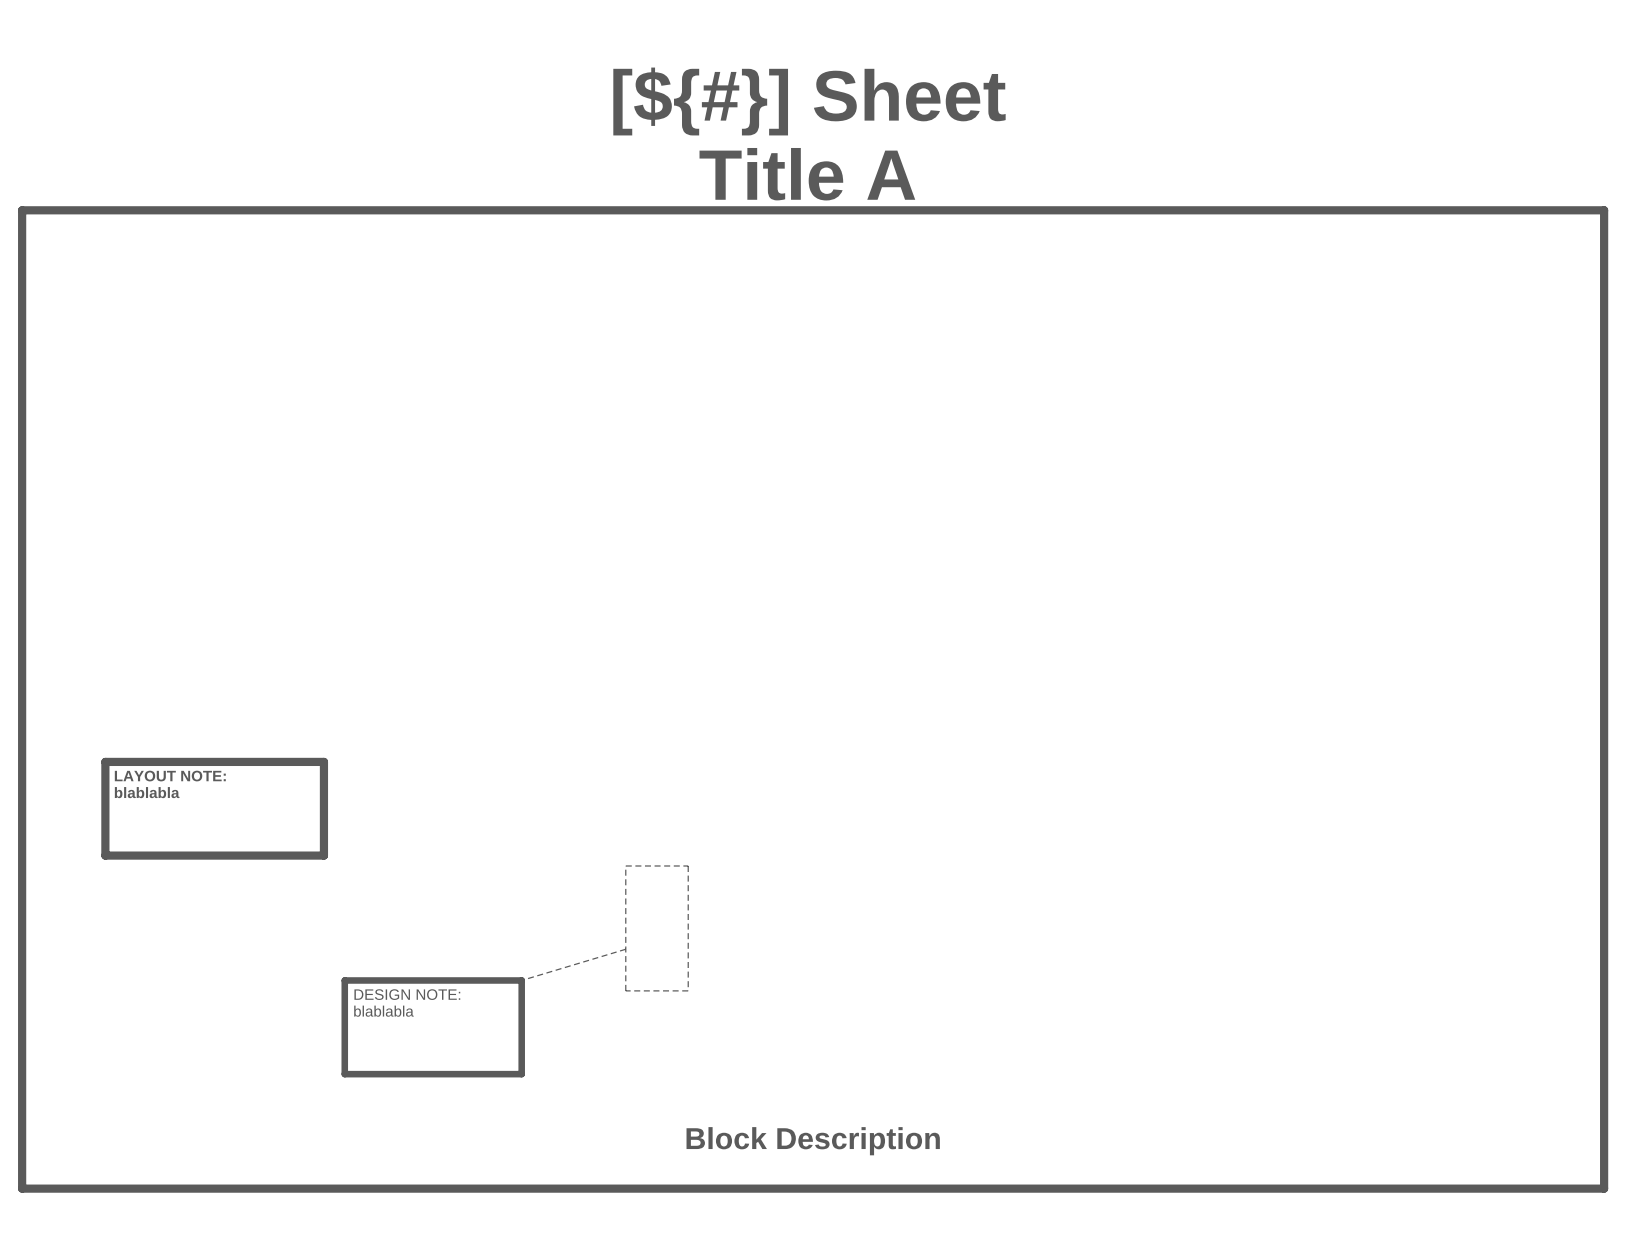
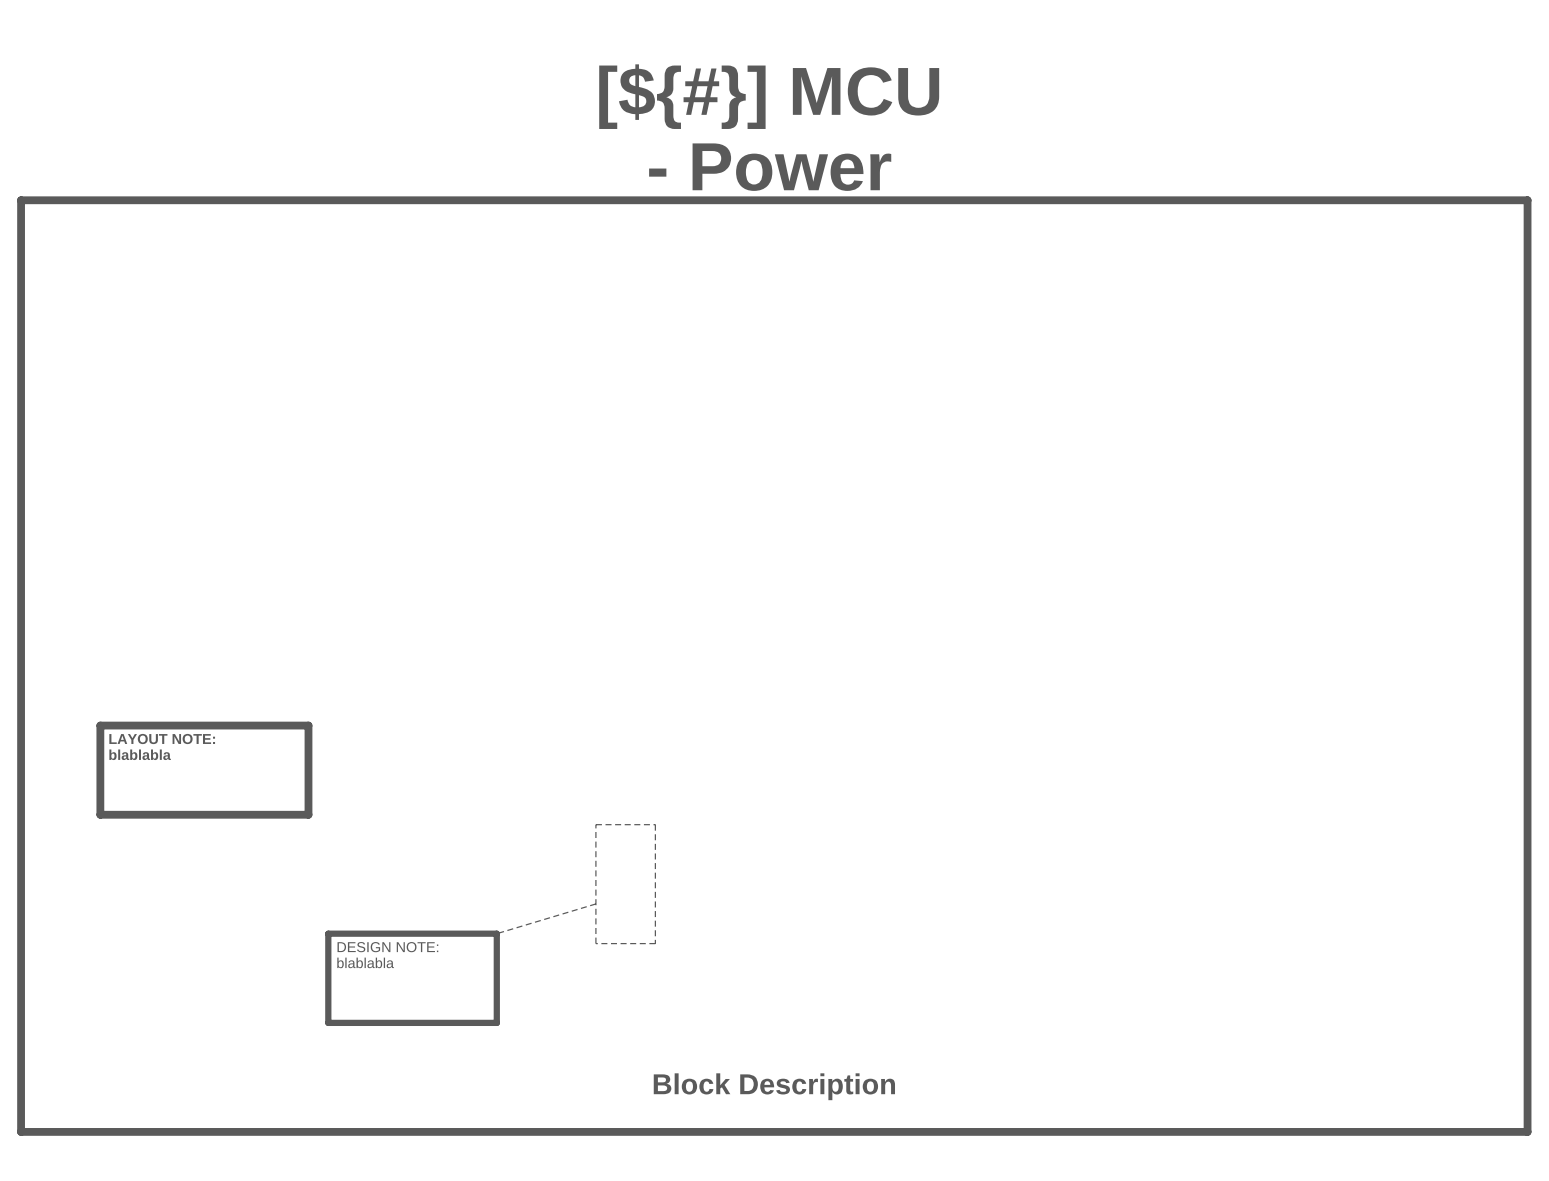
text: [${#}] Sheet (809, 101) -> [${#}] MCU (769, 96)
text: Title A (807, 174) -> - Power (770, 167)

